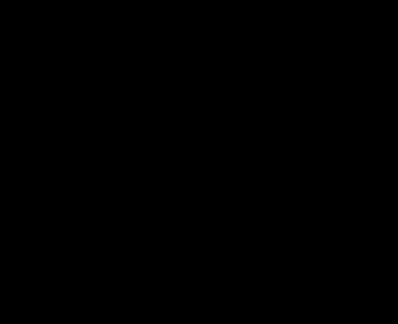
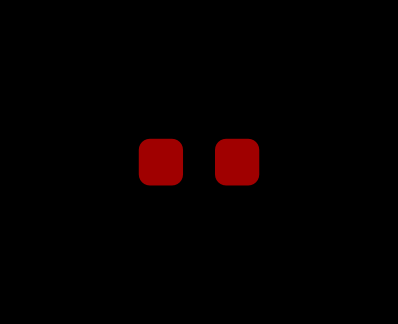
part: none -> (199, 162)

